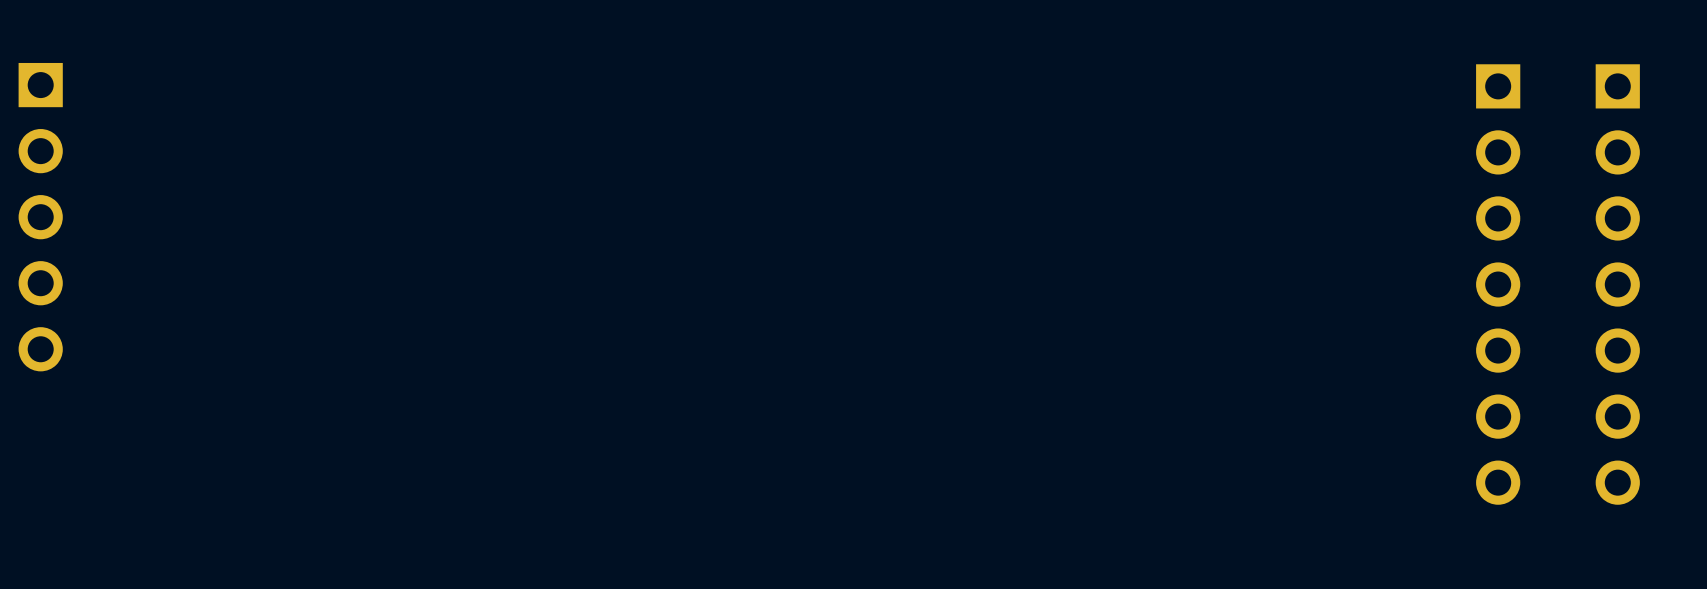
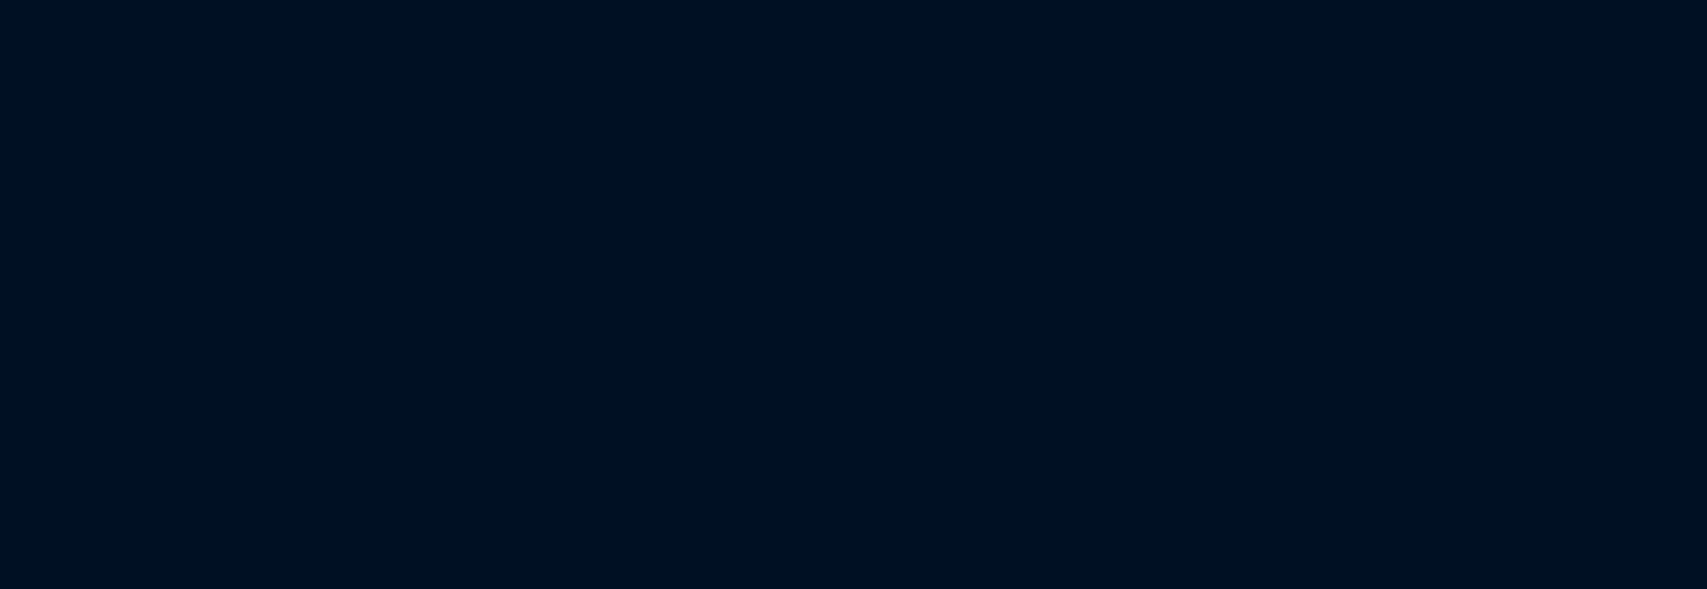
part: (40, 217) -> none
part: (1498, 284) -> none
part: (1617, 284) -> none

